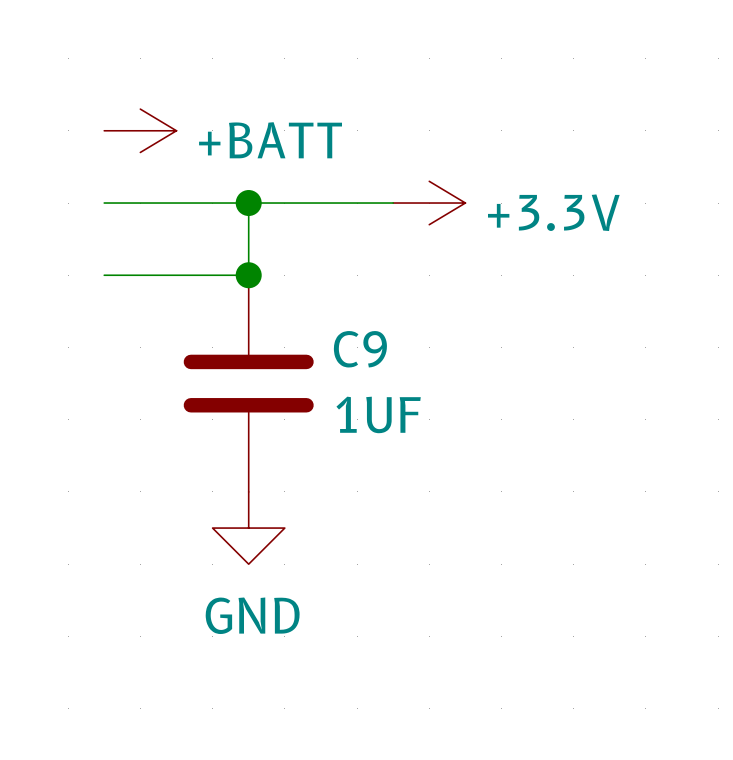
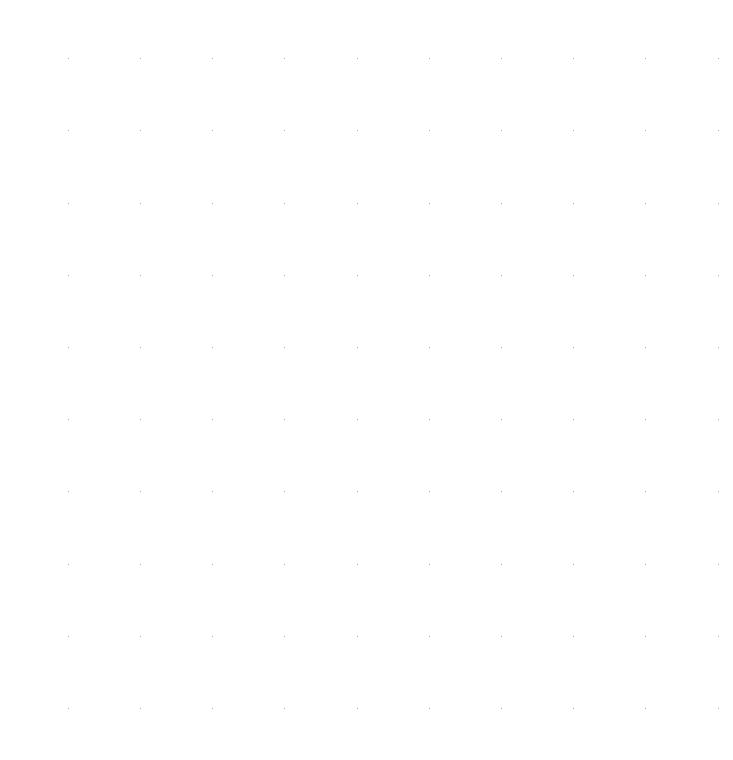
power symbol: +BATT (140, 130) -> none
wire: (104, 203) (393, 203) -> none
wire: (248, 203) (248, 275) (104, 275) -> none
junction: (248, 203) -> none
power symbol: +3.3V (429, 203) -> none
junction: (248, 275) -> none
C9: 1UF (248, 383) -> none
power symbol: GND (248, 528) -> none

